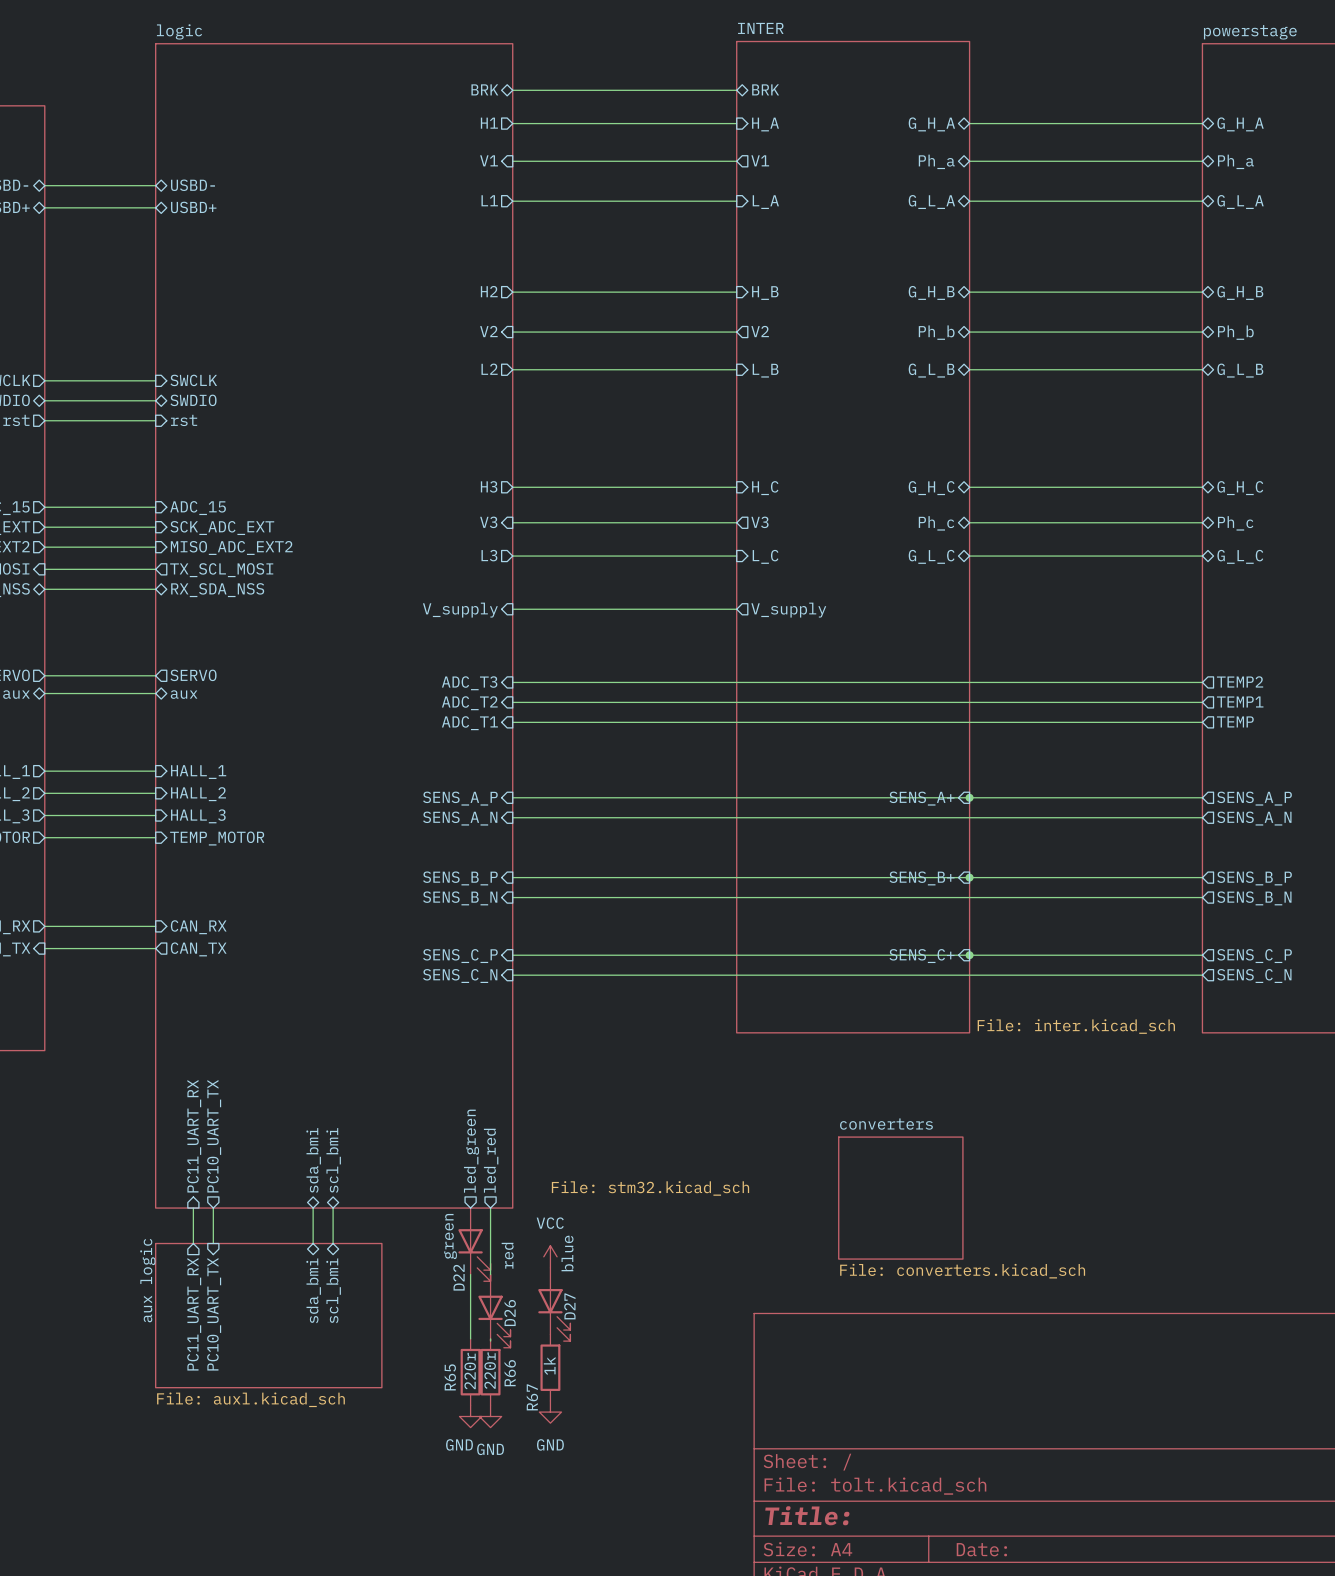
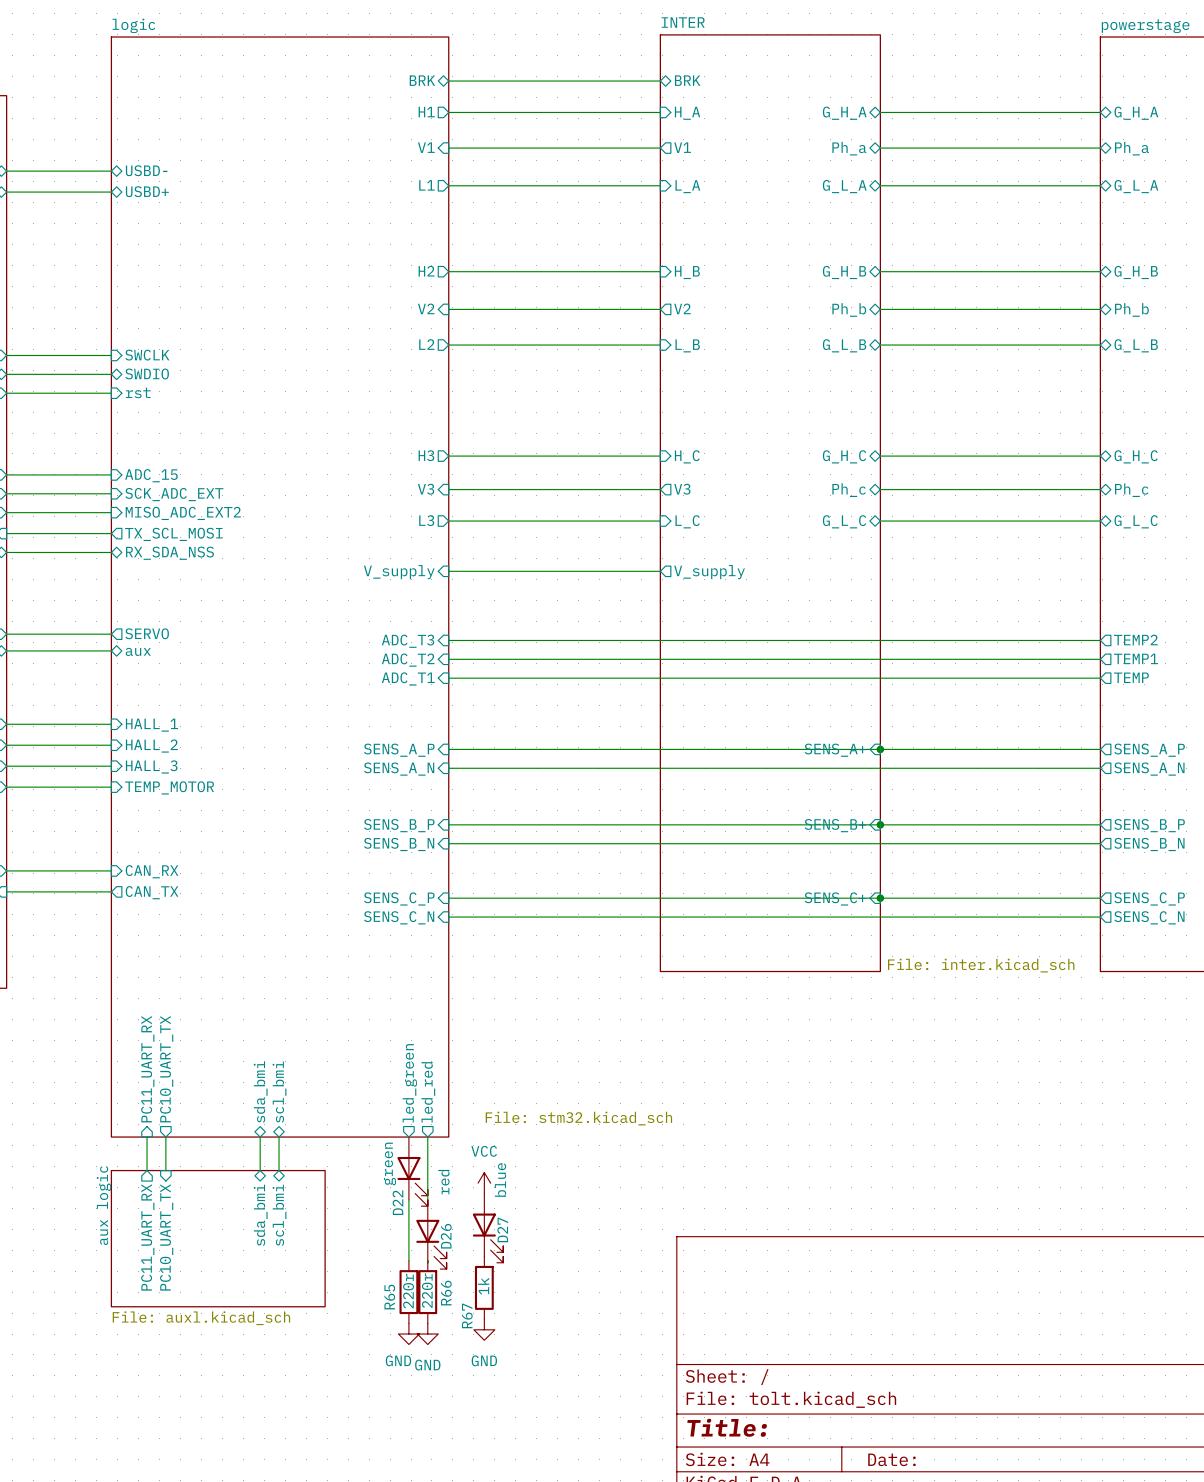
sheet converters: File: converters.kicad_sch (900, 1198) -> none

